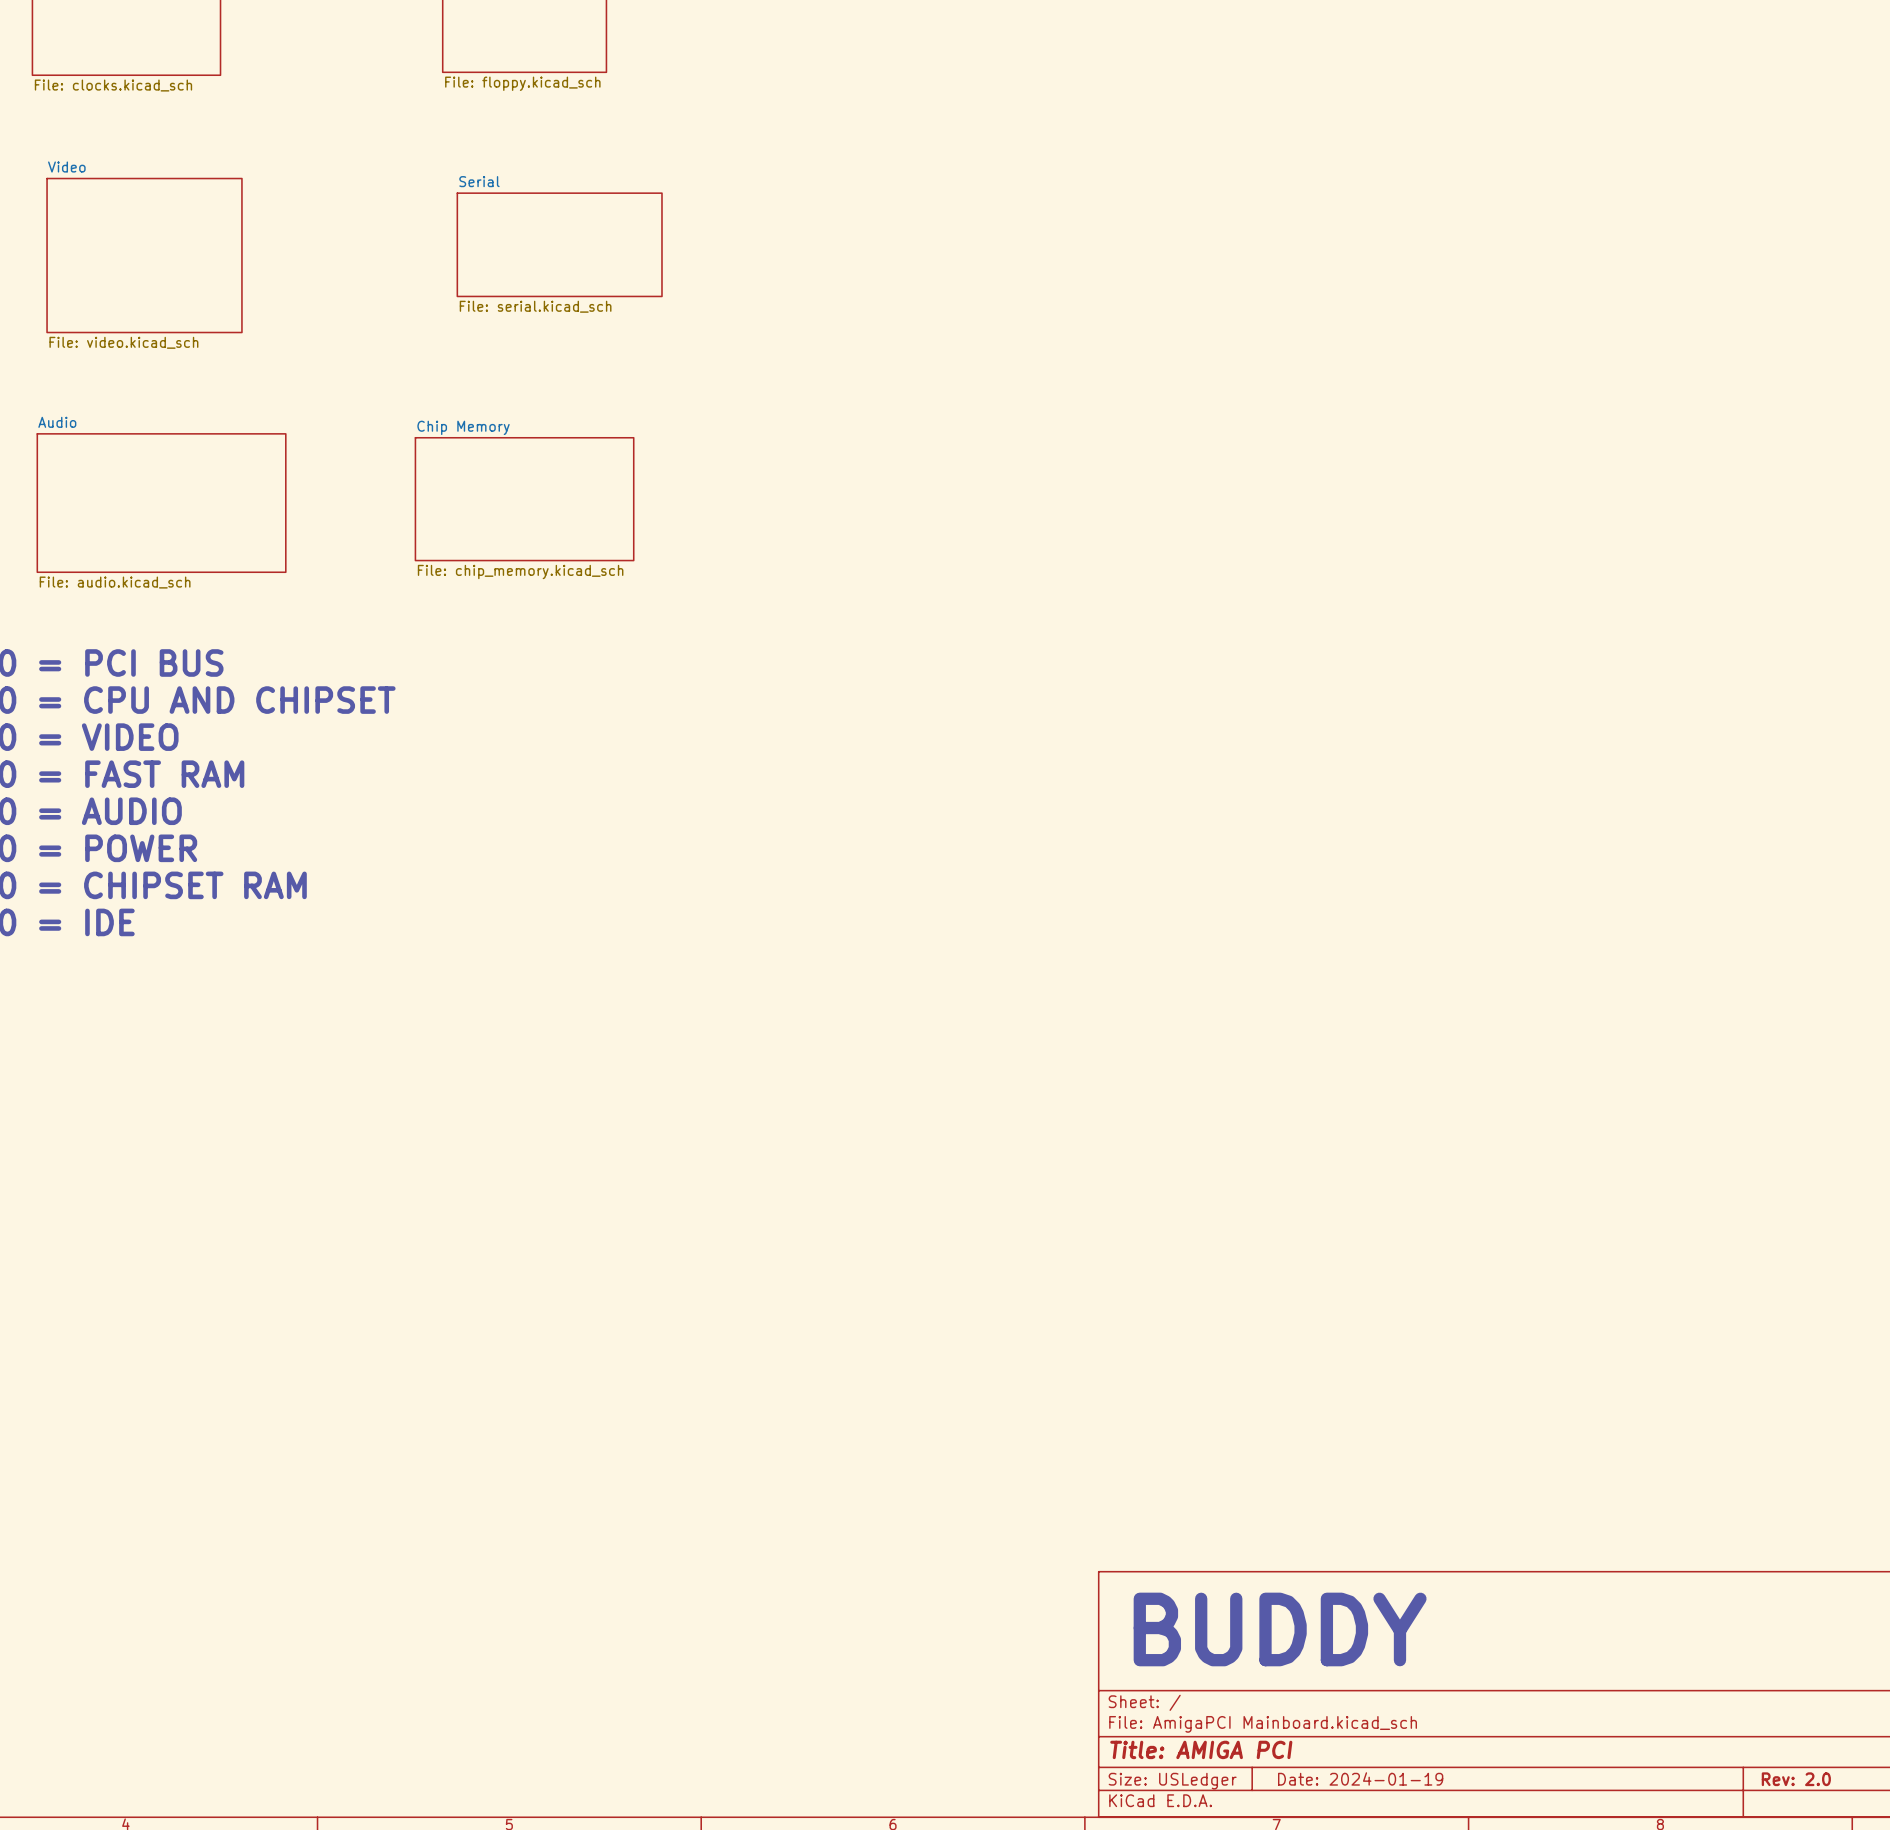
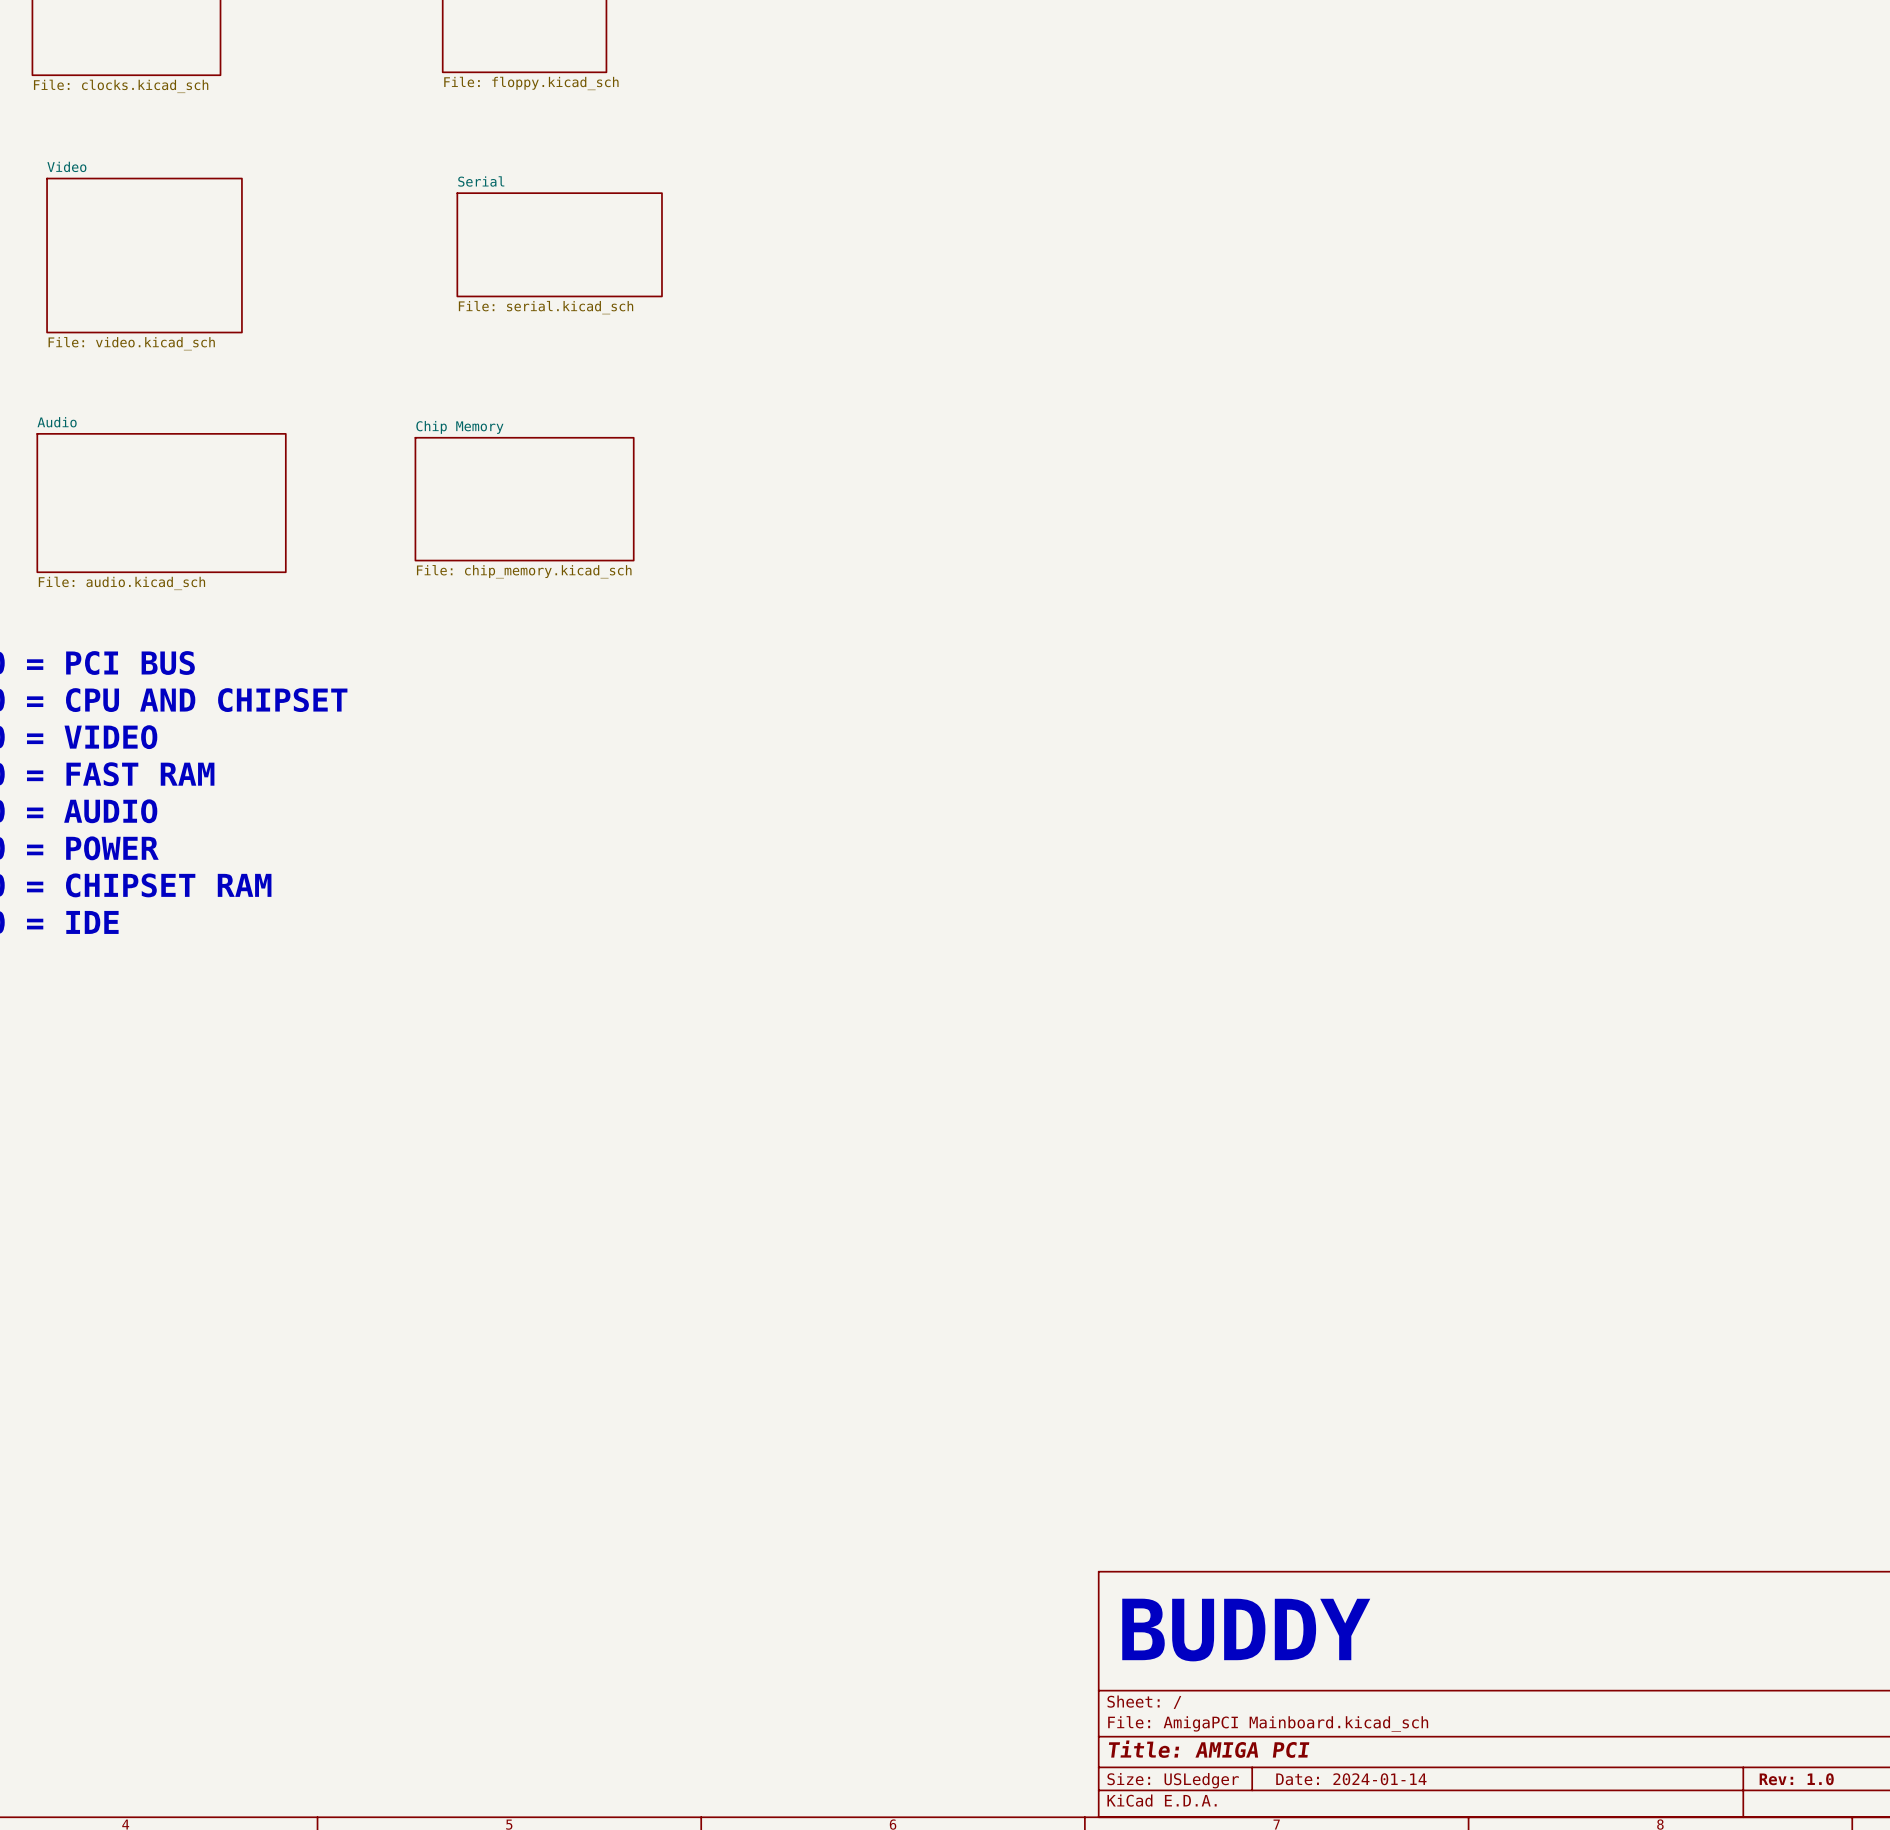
title block: Date: 2024-01-19 (1360, 1778) -> Date: 2024-01-14 (1351, 1779)
title block: Rev: 2.0 (1796, 1779) -> Rev: 1.0 (1796, 1779)

